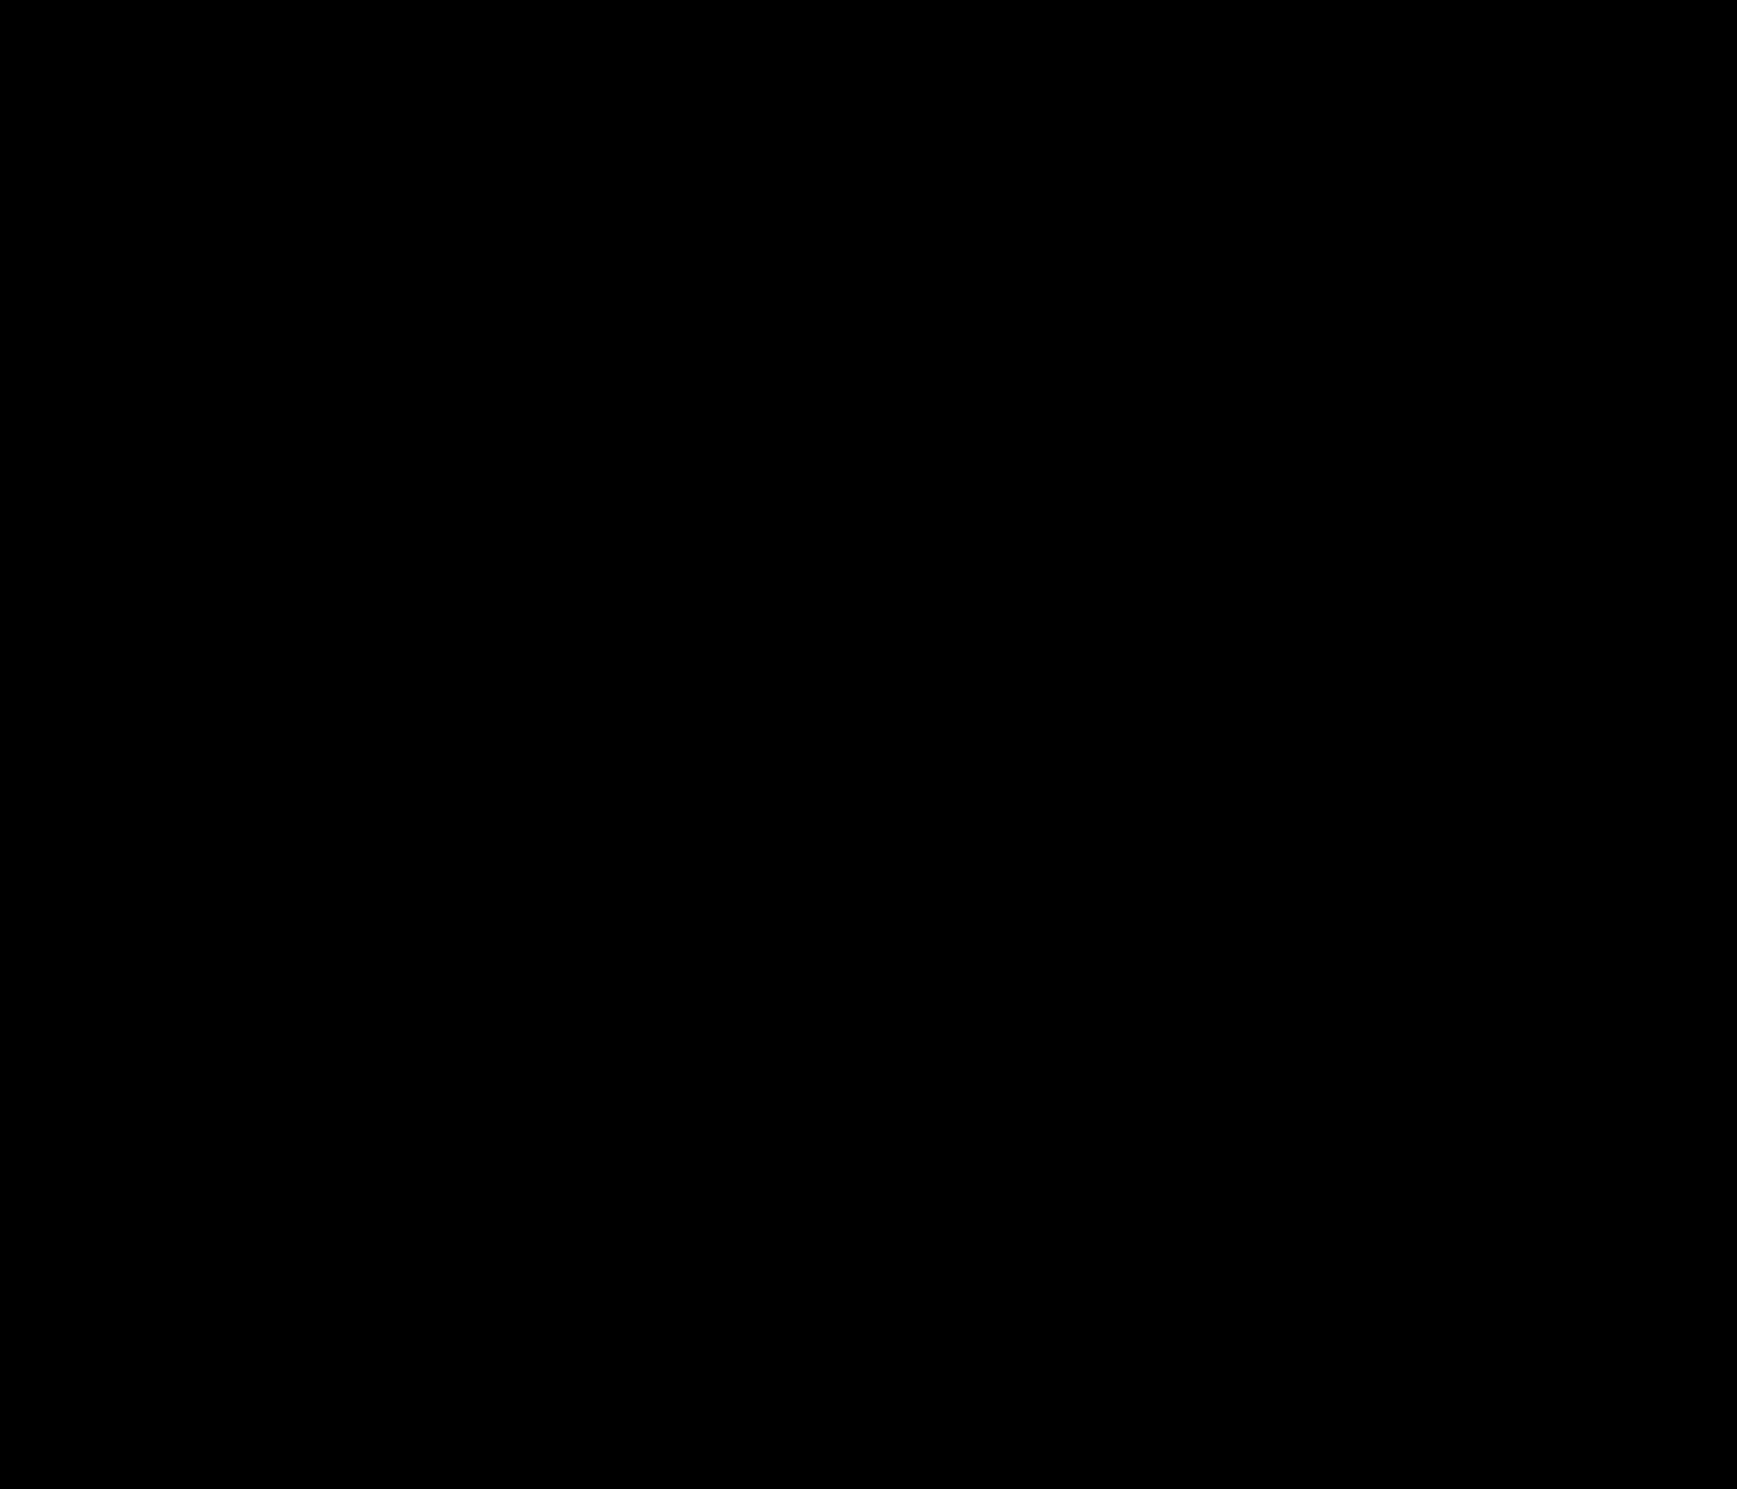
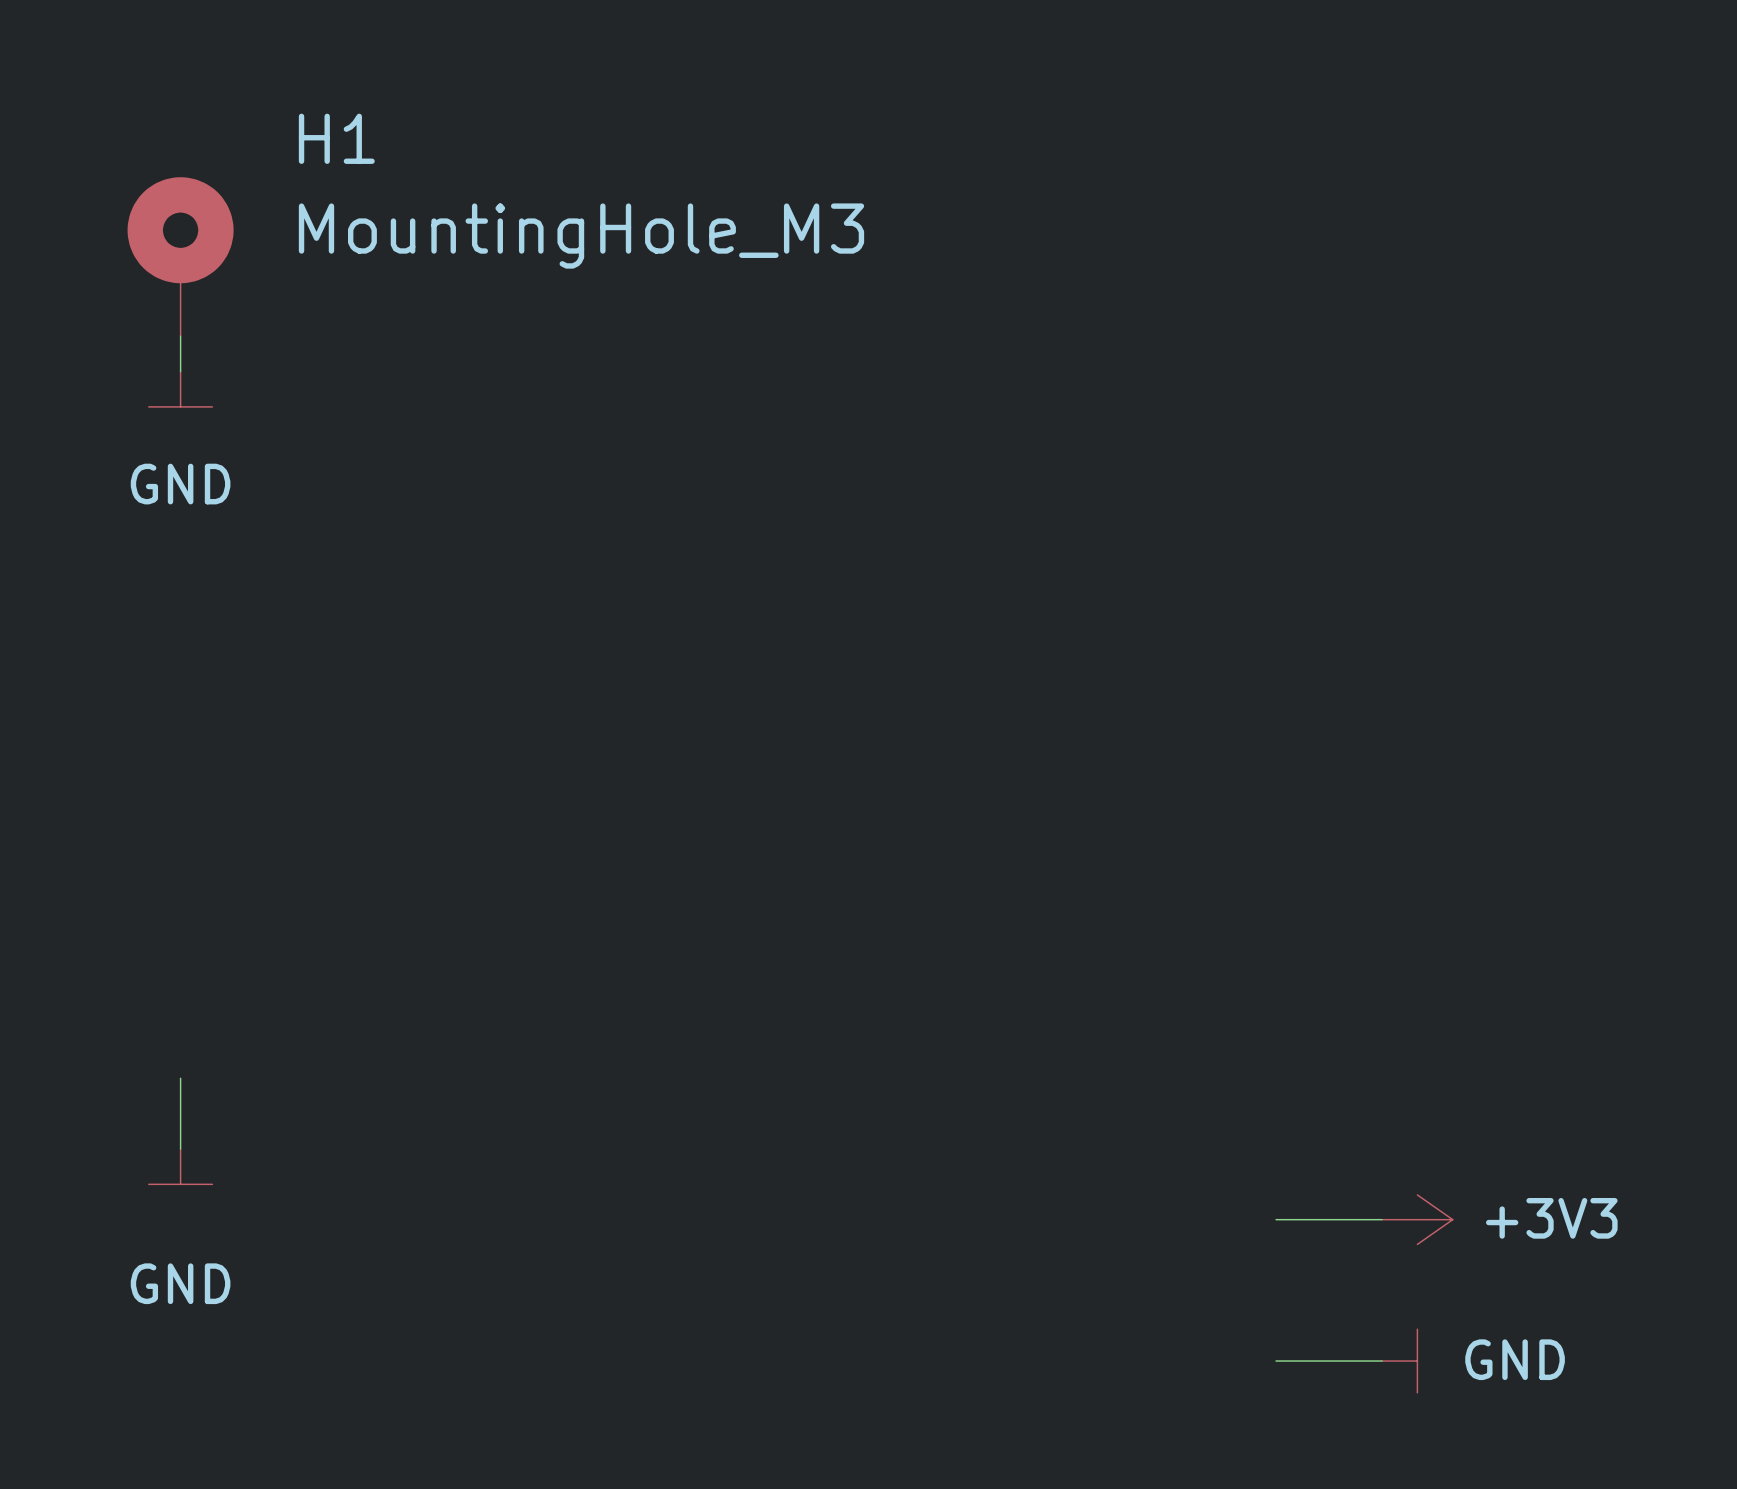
H1: none -> MountingHole_M3 (180, 256)
wire: none -> (180, 336) (180, 371)
power symbol: none -> GND (180, 389)
wire: none -> (180, 1078) (180, 1148)
power symbol: none -> GND (180, 1166)
wire: none -> (1276, 1219) (1382, 1219)
power symbol: none -> +3V3 (1417, 1219)
wire: none -> (1276, 1361) (1382, 1361)
power symbol: none -> GND (1399, 1361)

